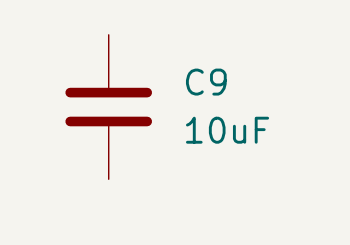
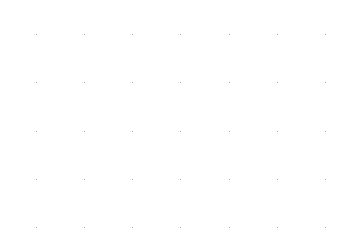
C9: 10uF (108, 107) -> none

